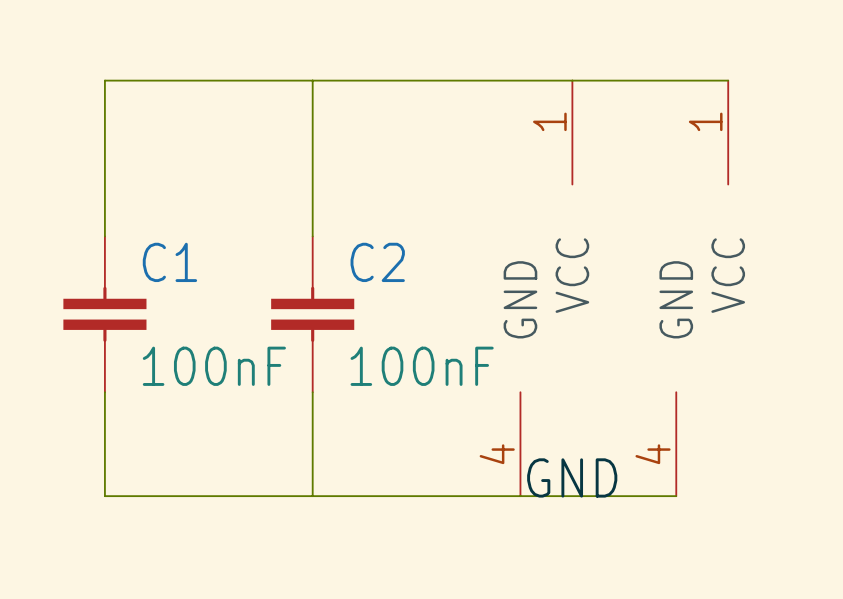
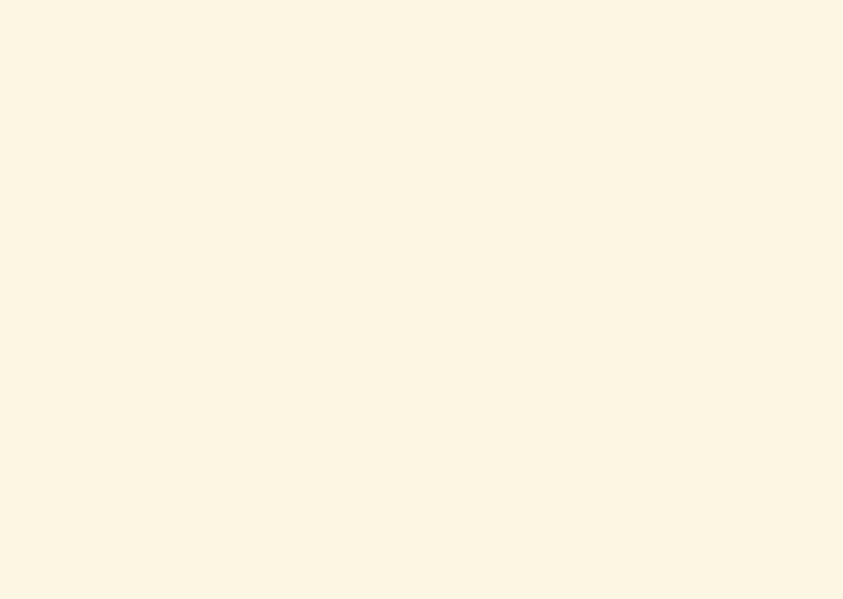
wire: (312, 80) (312, 236) -> none
wire: (728, 80) (104, 80) (104, 236) -> none
part: (546, 288) -> none
part: (702, 288) -> none
C1: 100nF (104, 314) -> none
C2: 100nF (312, 314) -> none
wire: (104, 392) (104, 496) (676, 496) -> none
wire: (312, 392) (312, 496) -> none
label: GND (572, 477) -> none

